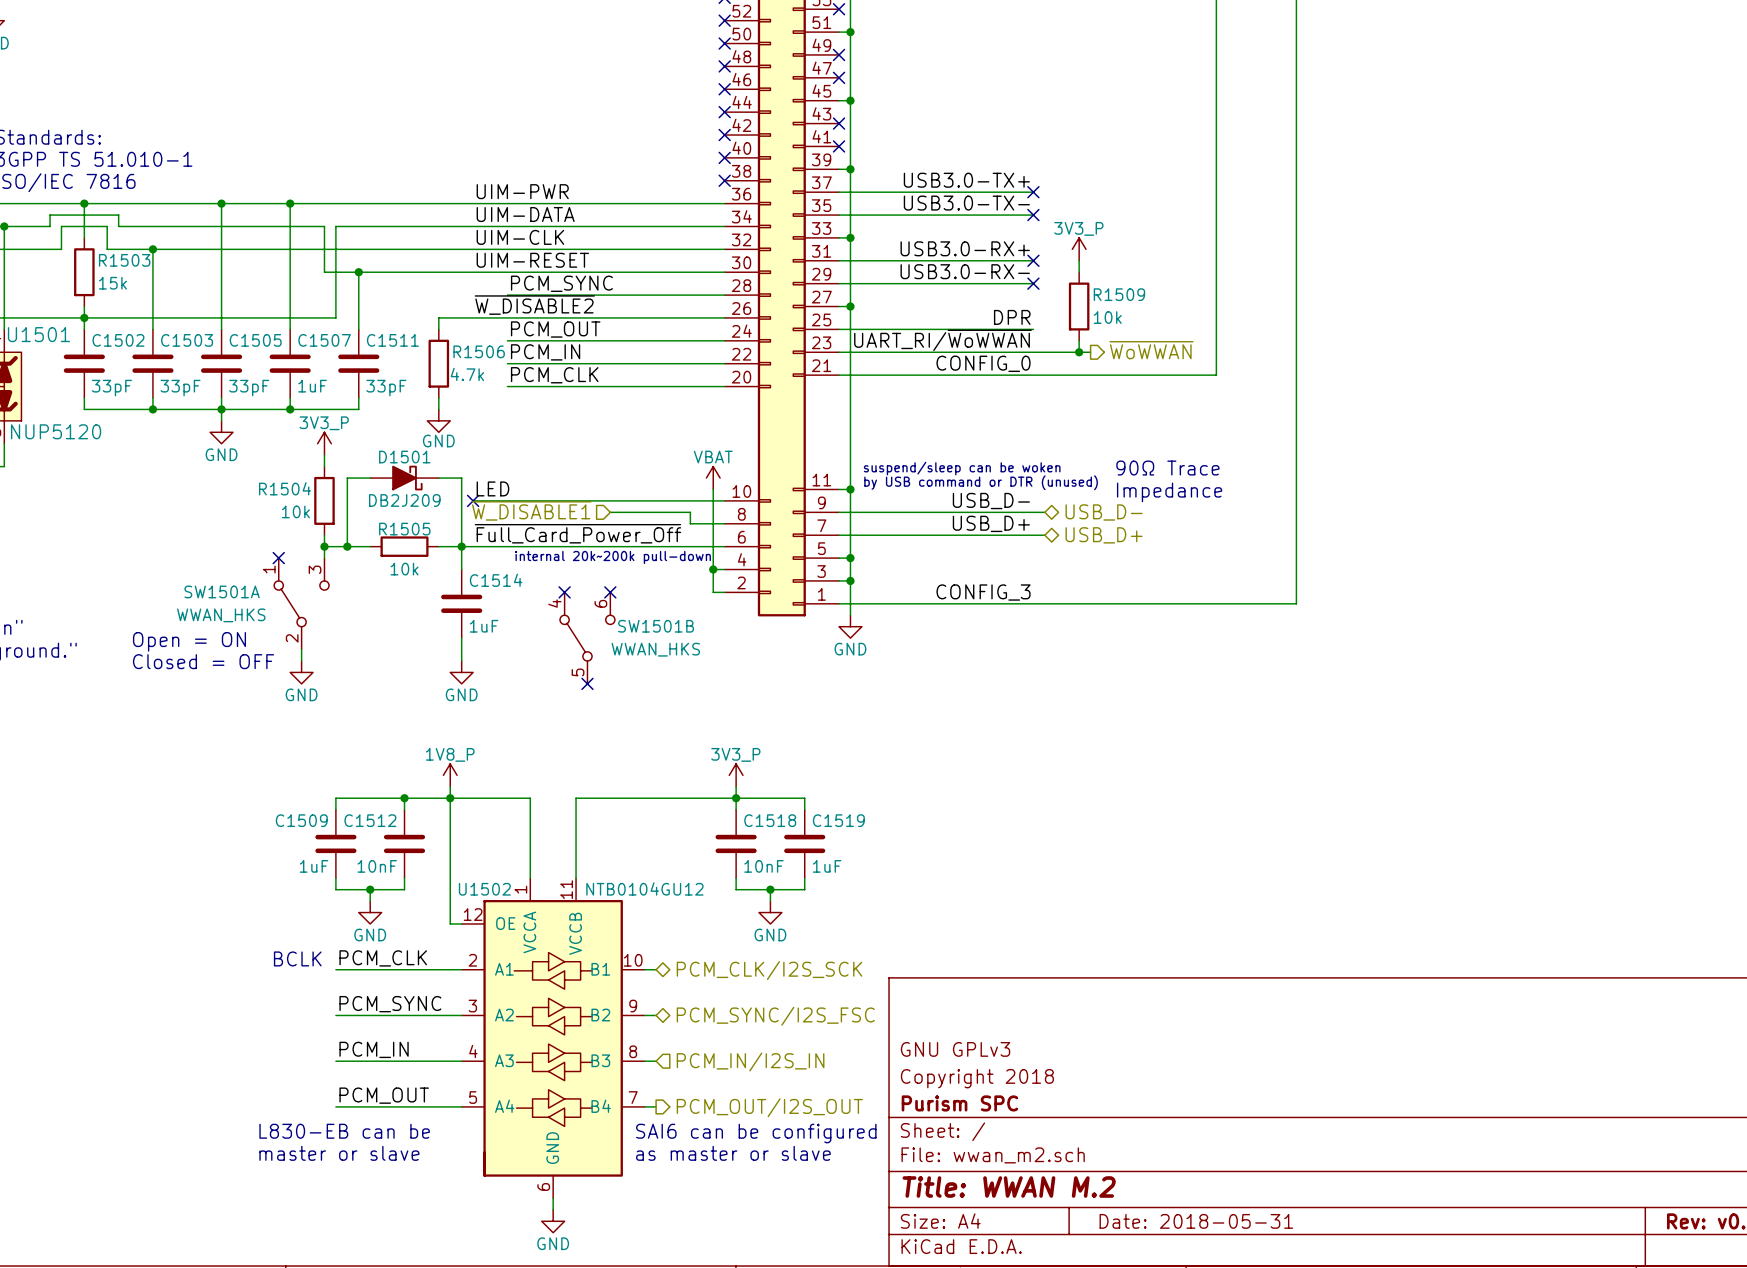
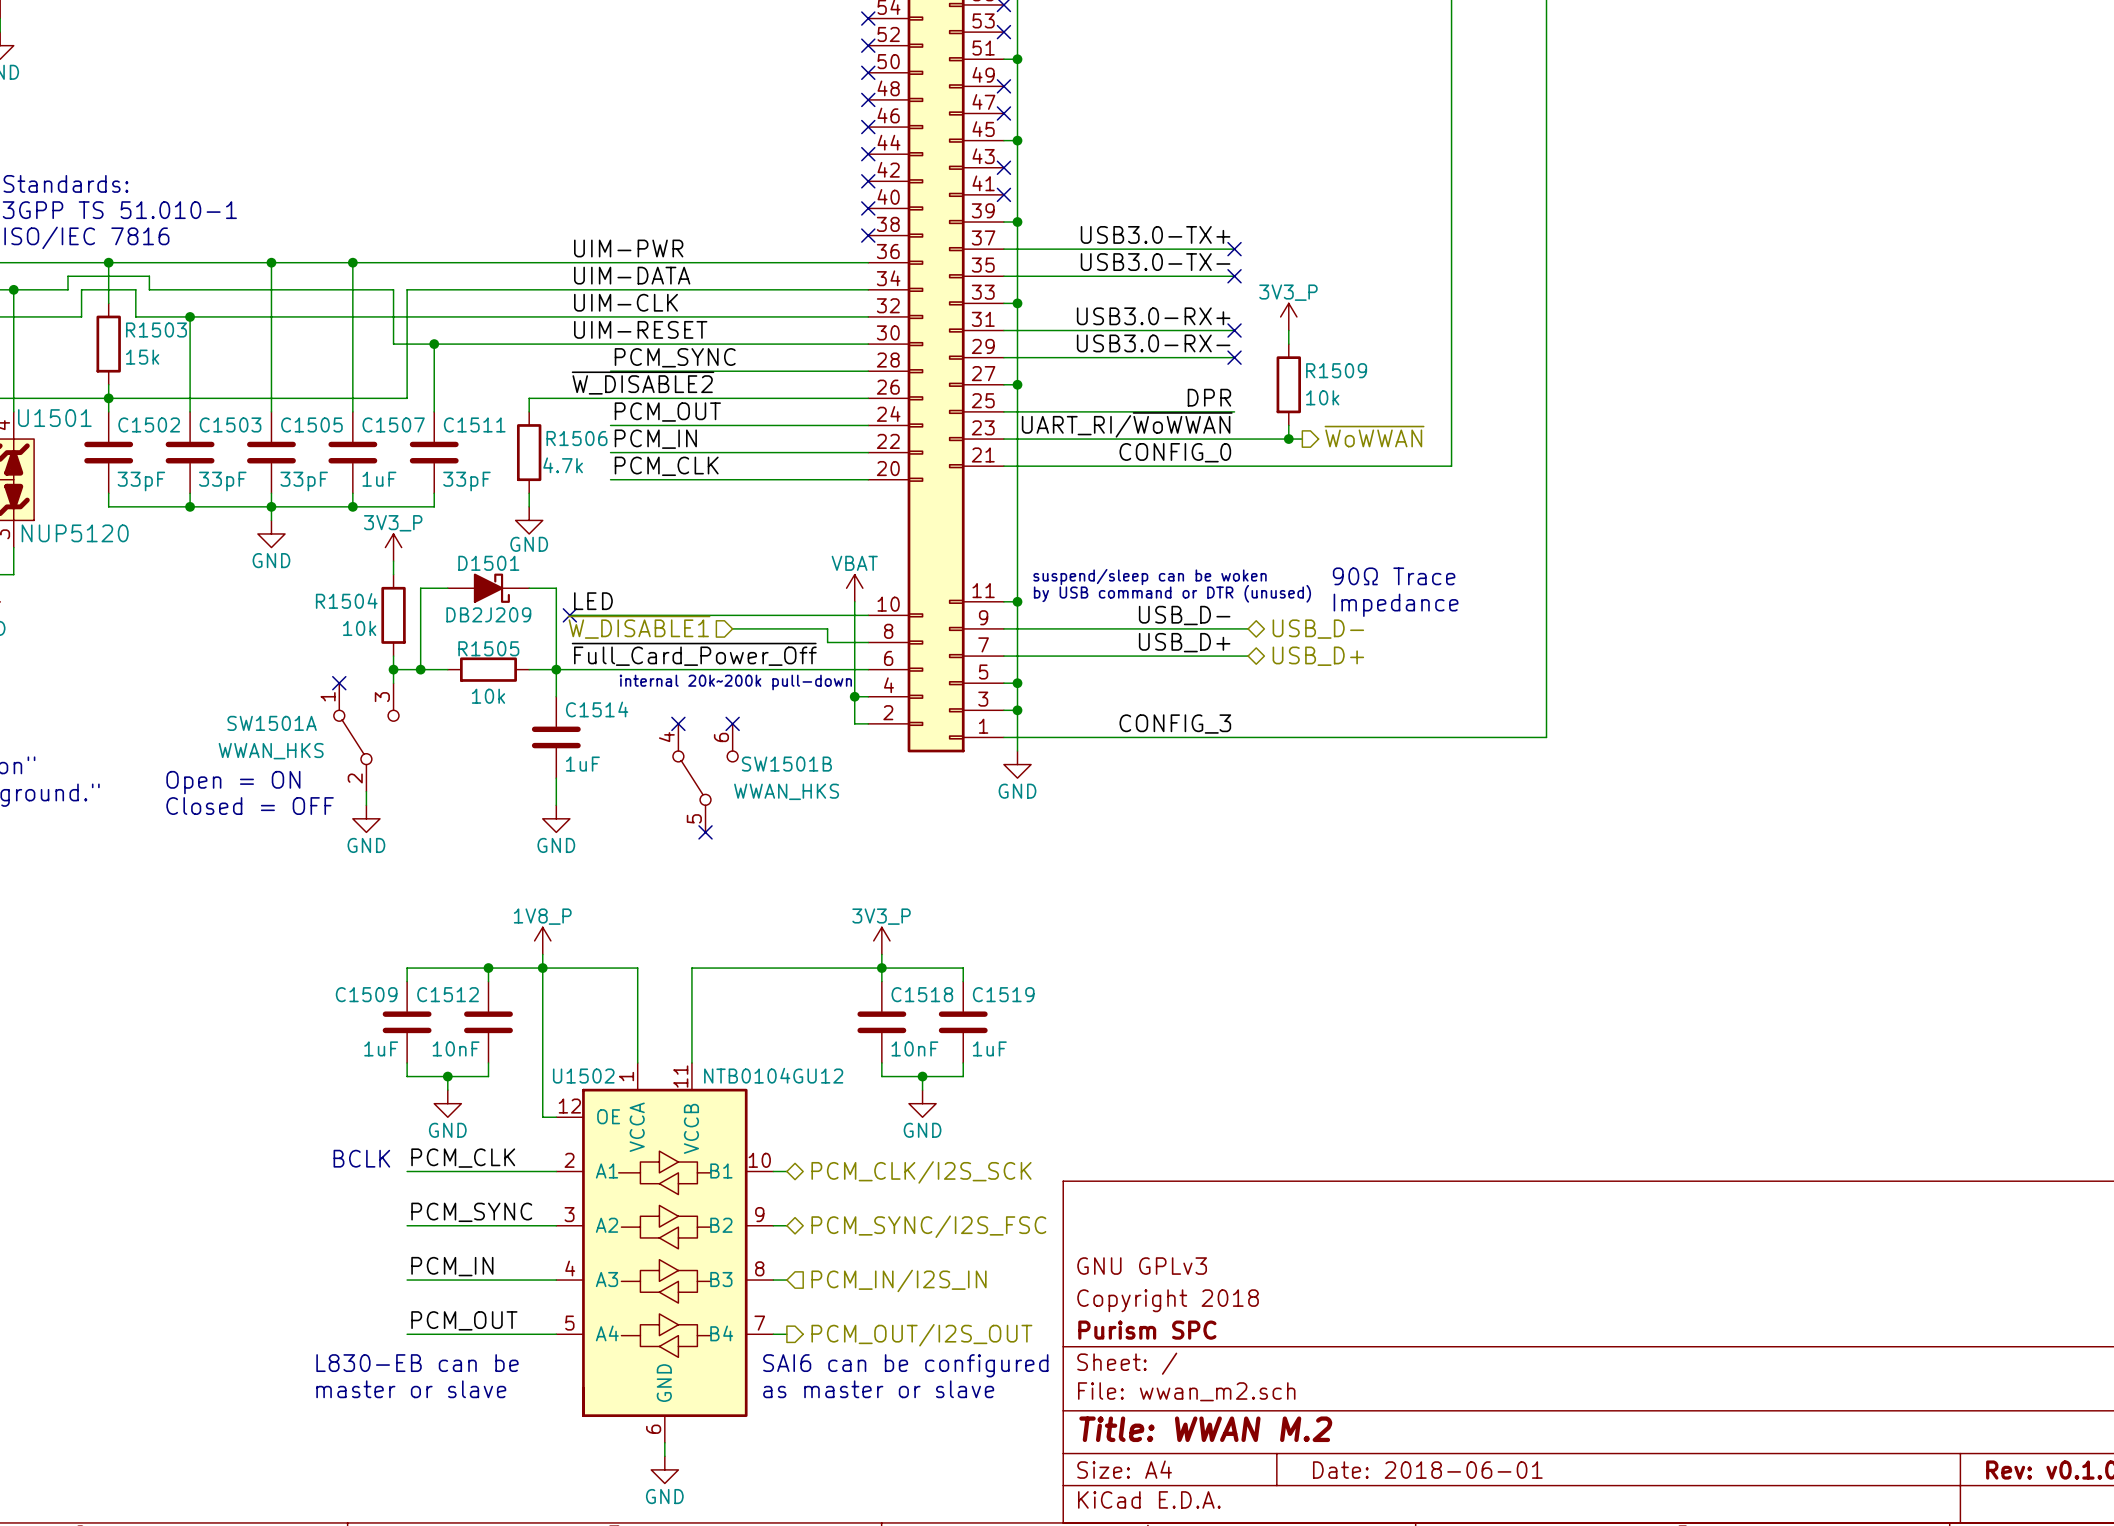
title block: Date: 2018-05-31 (1196, 1221) -> Date: 2018-06-01 (1427, 1470)

